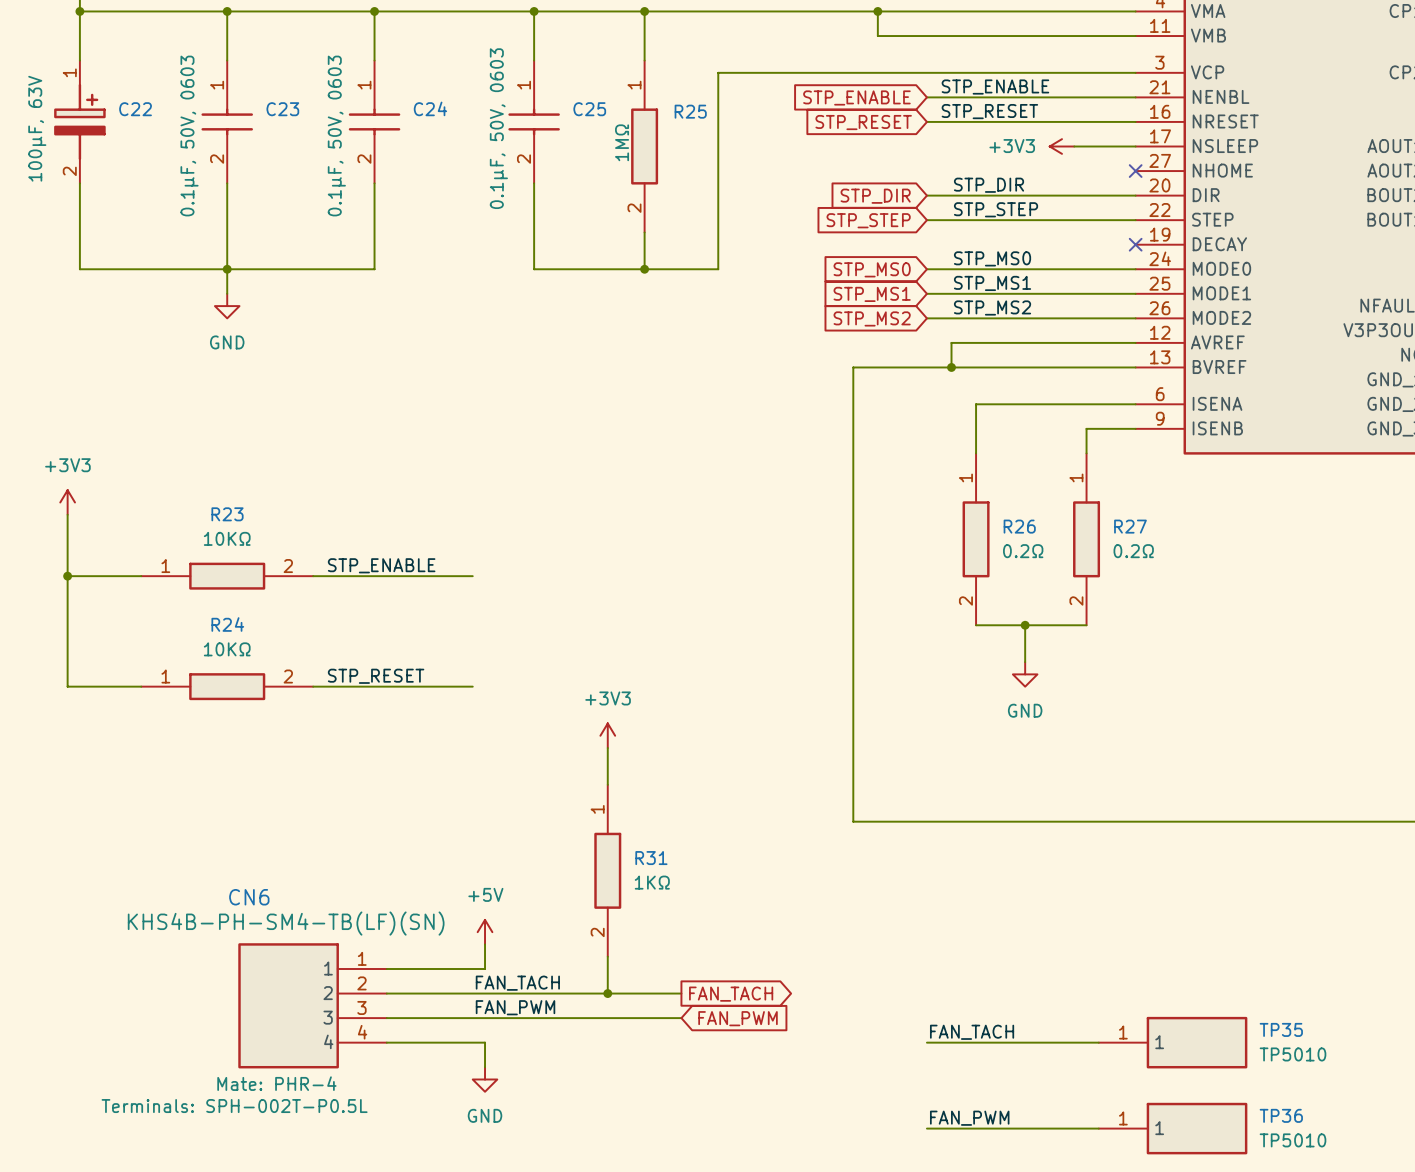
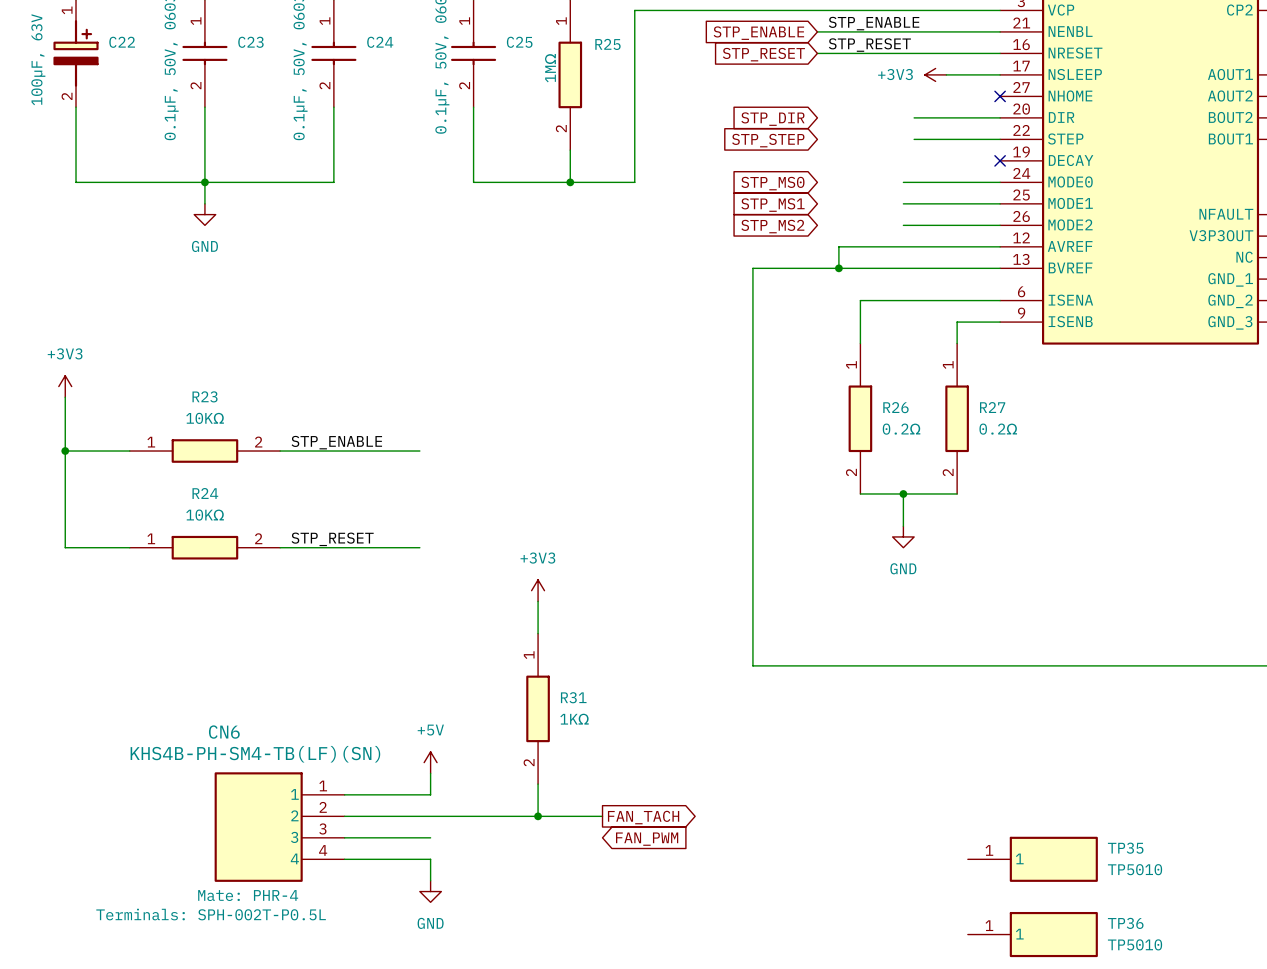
label: STP_DIR (989, 185) -> none
wire: (926, 195) (1037, 195) -> none
label: STP_STEP (996, 209) -> none
wire: (926, 220) (1037, 220) -> none
label: STP_MS0 (992, 258) -> none
wire: (926, 269) (1025, 269) -> none
label: STP_MS1 (992, 283) -> none
wire: (926, 293) (1025, 293) -> none
label: STP_MS2 (992, 307) -> none
wire: (926, 318) (1025, 318) -> none
label: FAN_TACH (517, 983) -> none
label: FAN_PWM (515, 1007) -> none
wire: (485, 1018) (681, 1018) -> none
label: FAN_TACH (972, 1032) -> none
wire: (926, 1042) (1098, 1042) -> none
label: FAN_PWM (969, 1118) -> none
wire: (926, 1128) (1098, 1128) -> none

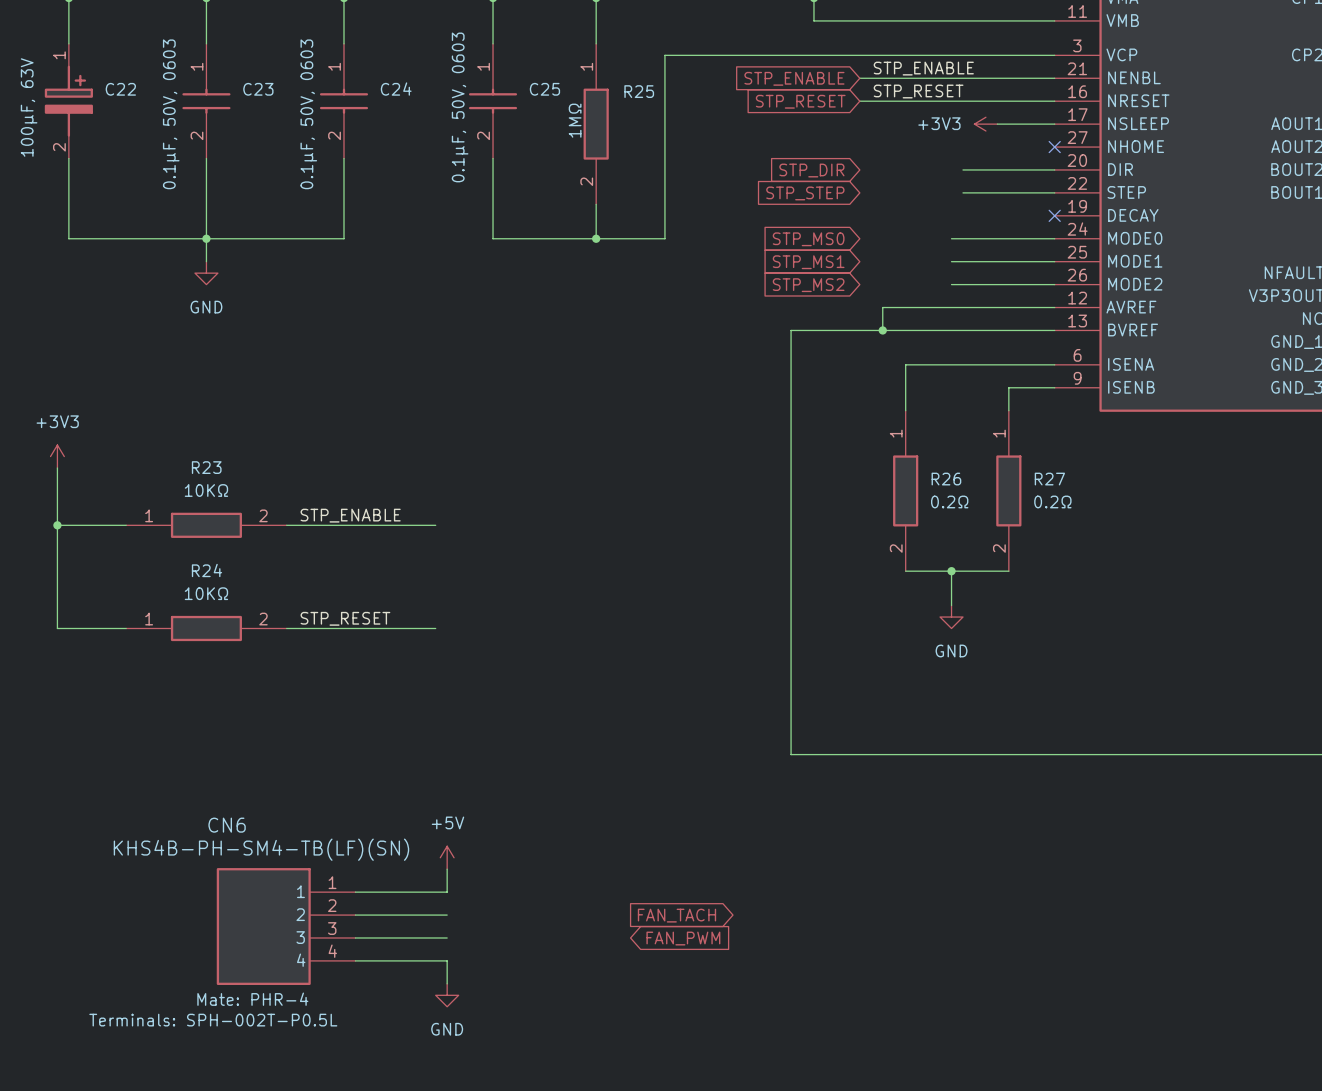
power symbol: +3V3 (538, 590) -> none
wire: (538, 601) (538, 633) -> none
R31: (538, 708) -> none
wire: (538, 784) (538, 816) -> none
wire: (430, 816) (602, 816) -> none
junction: (538, 816) -> none
TP35: TP5010 (1032, 859) -> none
TP36: TP5010 (1032, 934) -> none

